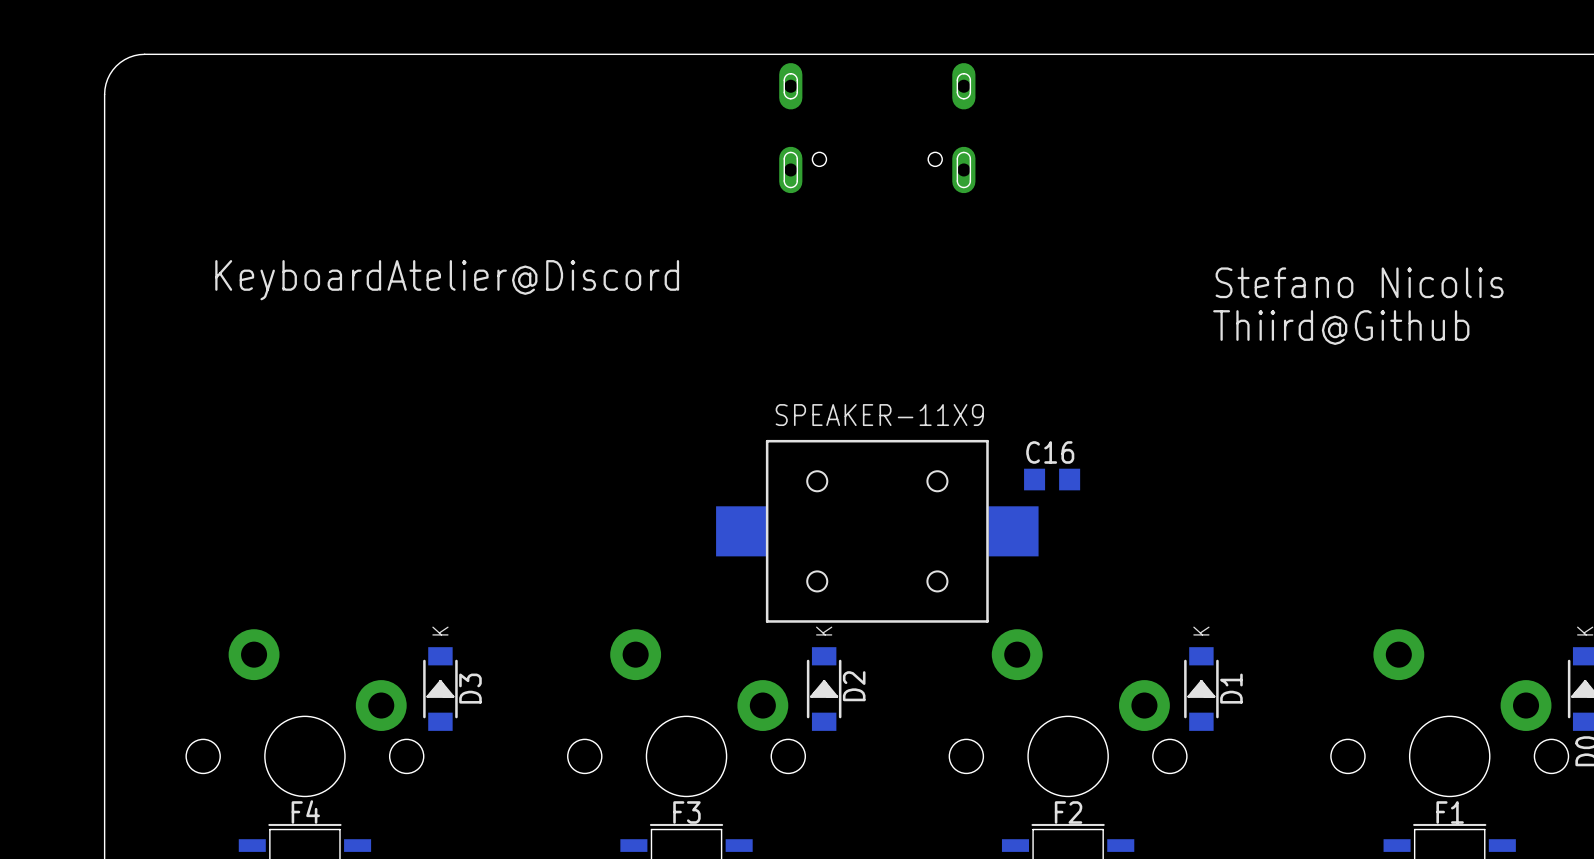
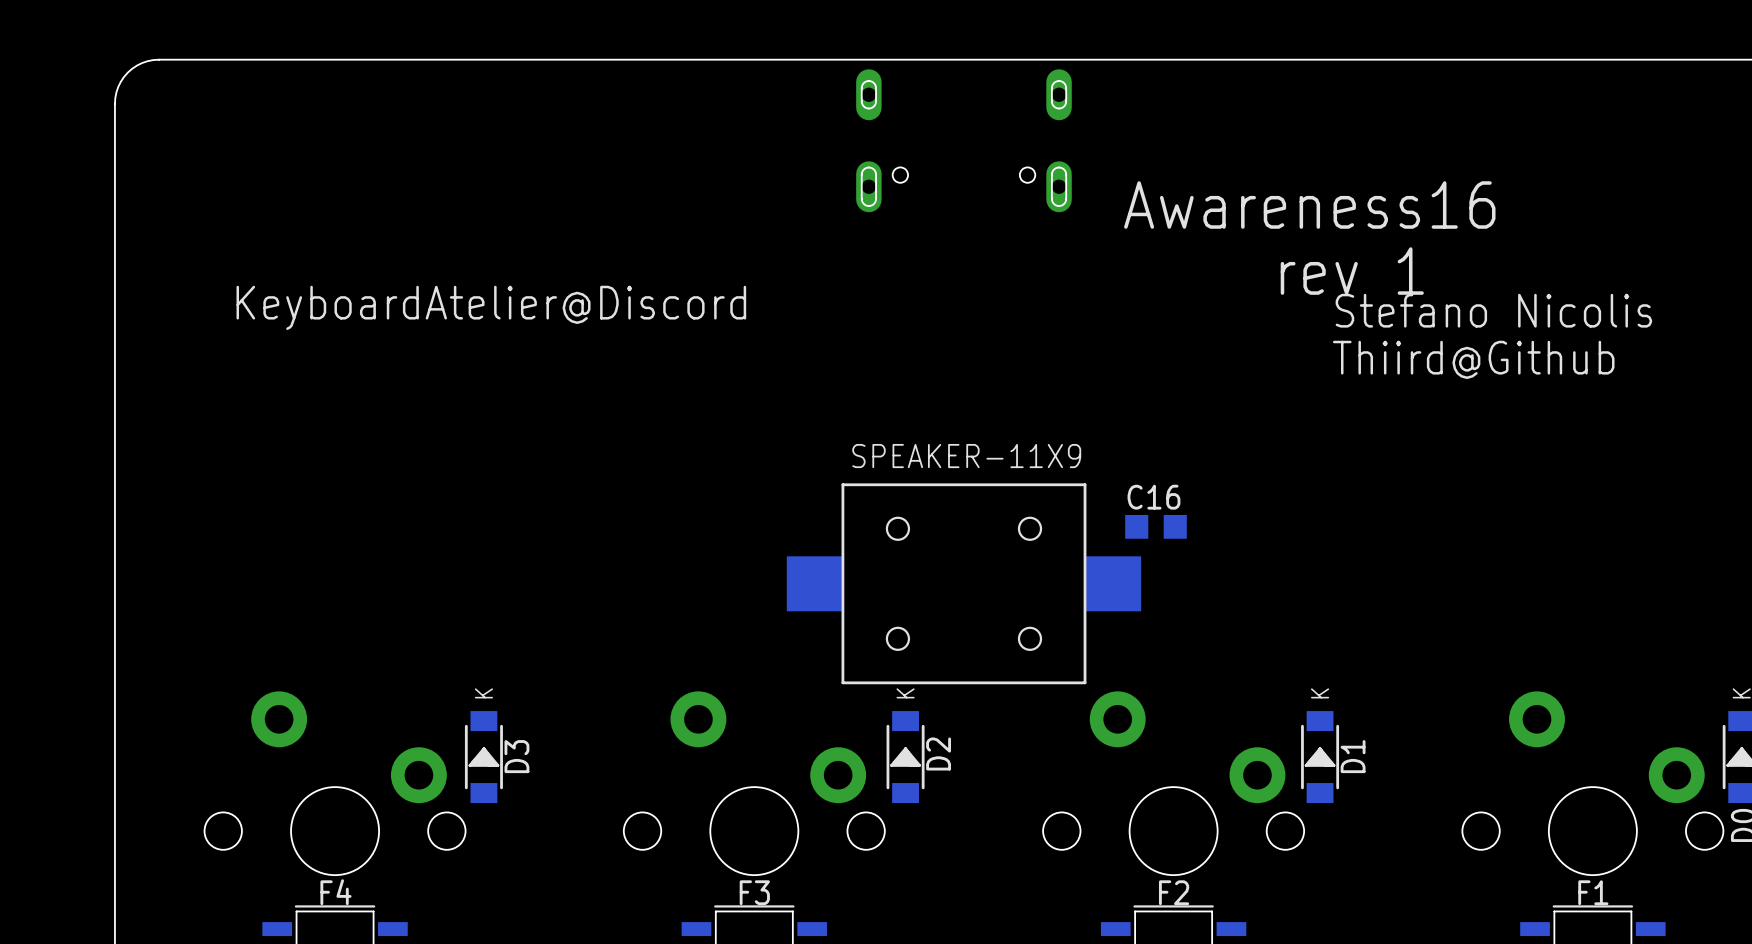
text: none -> Awareness16 (1309, 205)
text: none -> rev 1 (1352, 271)

